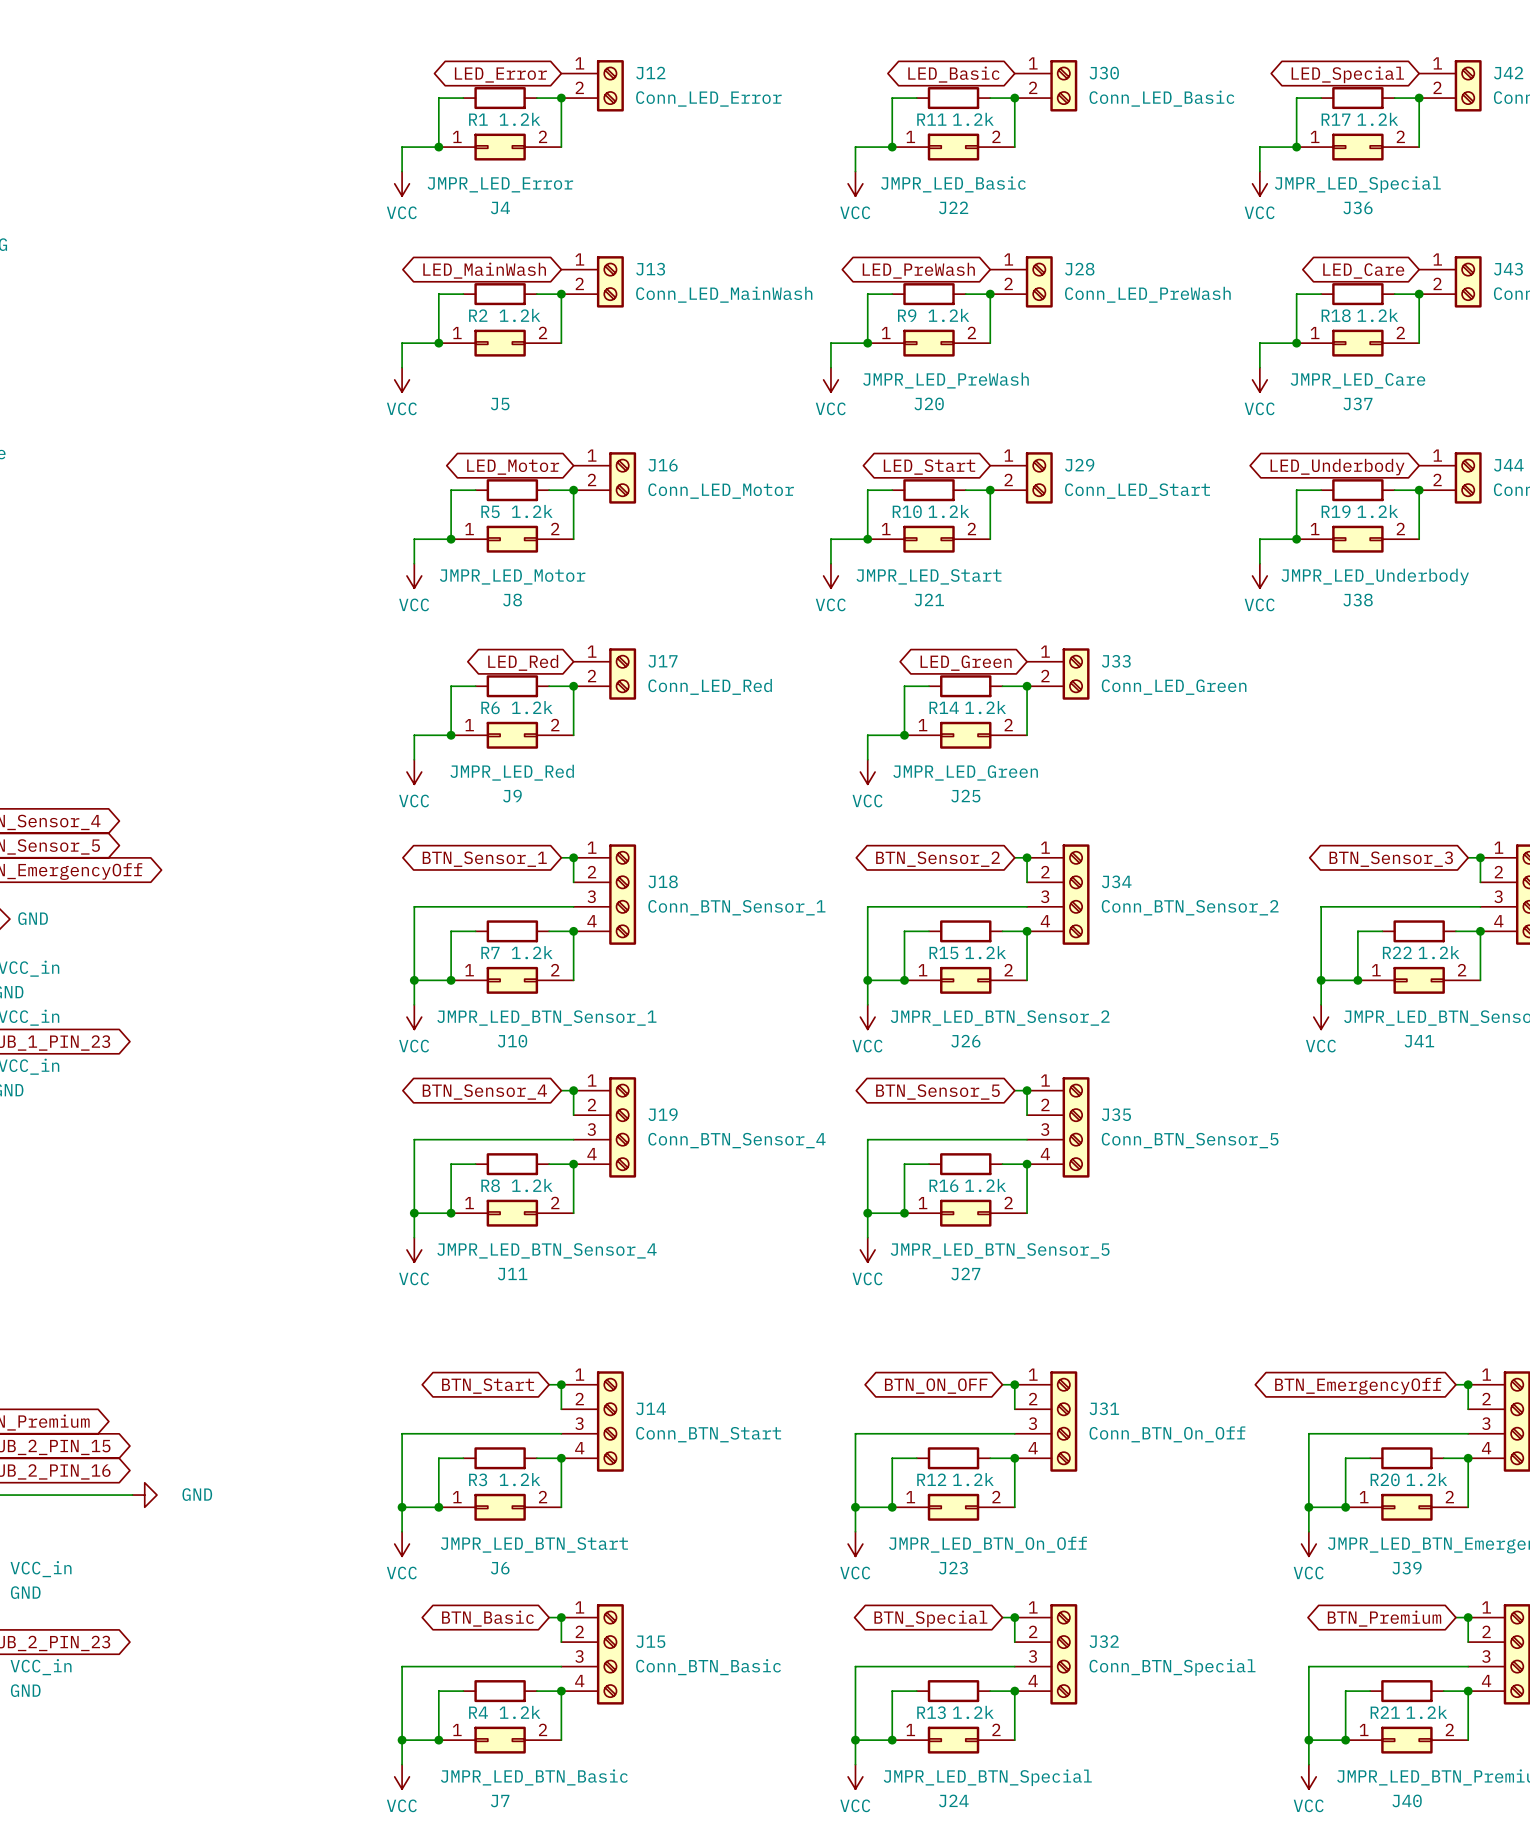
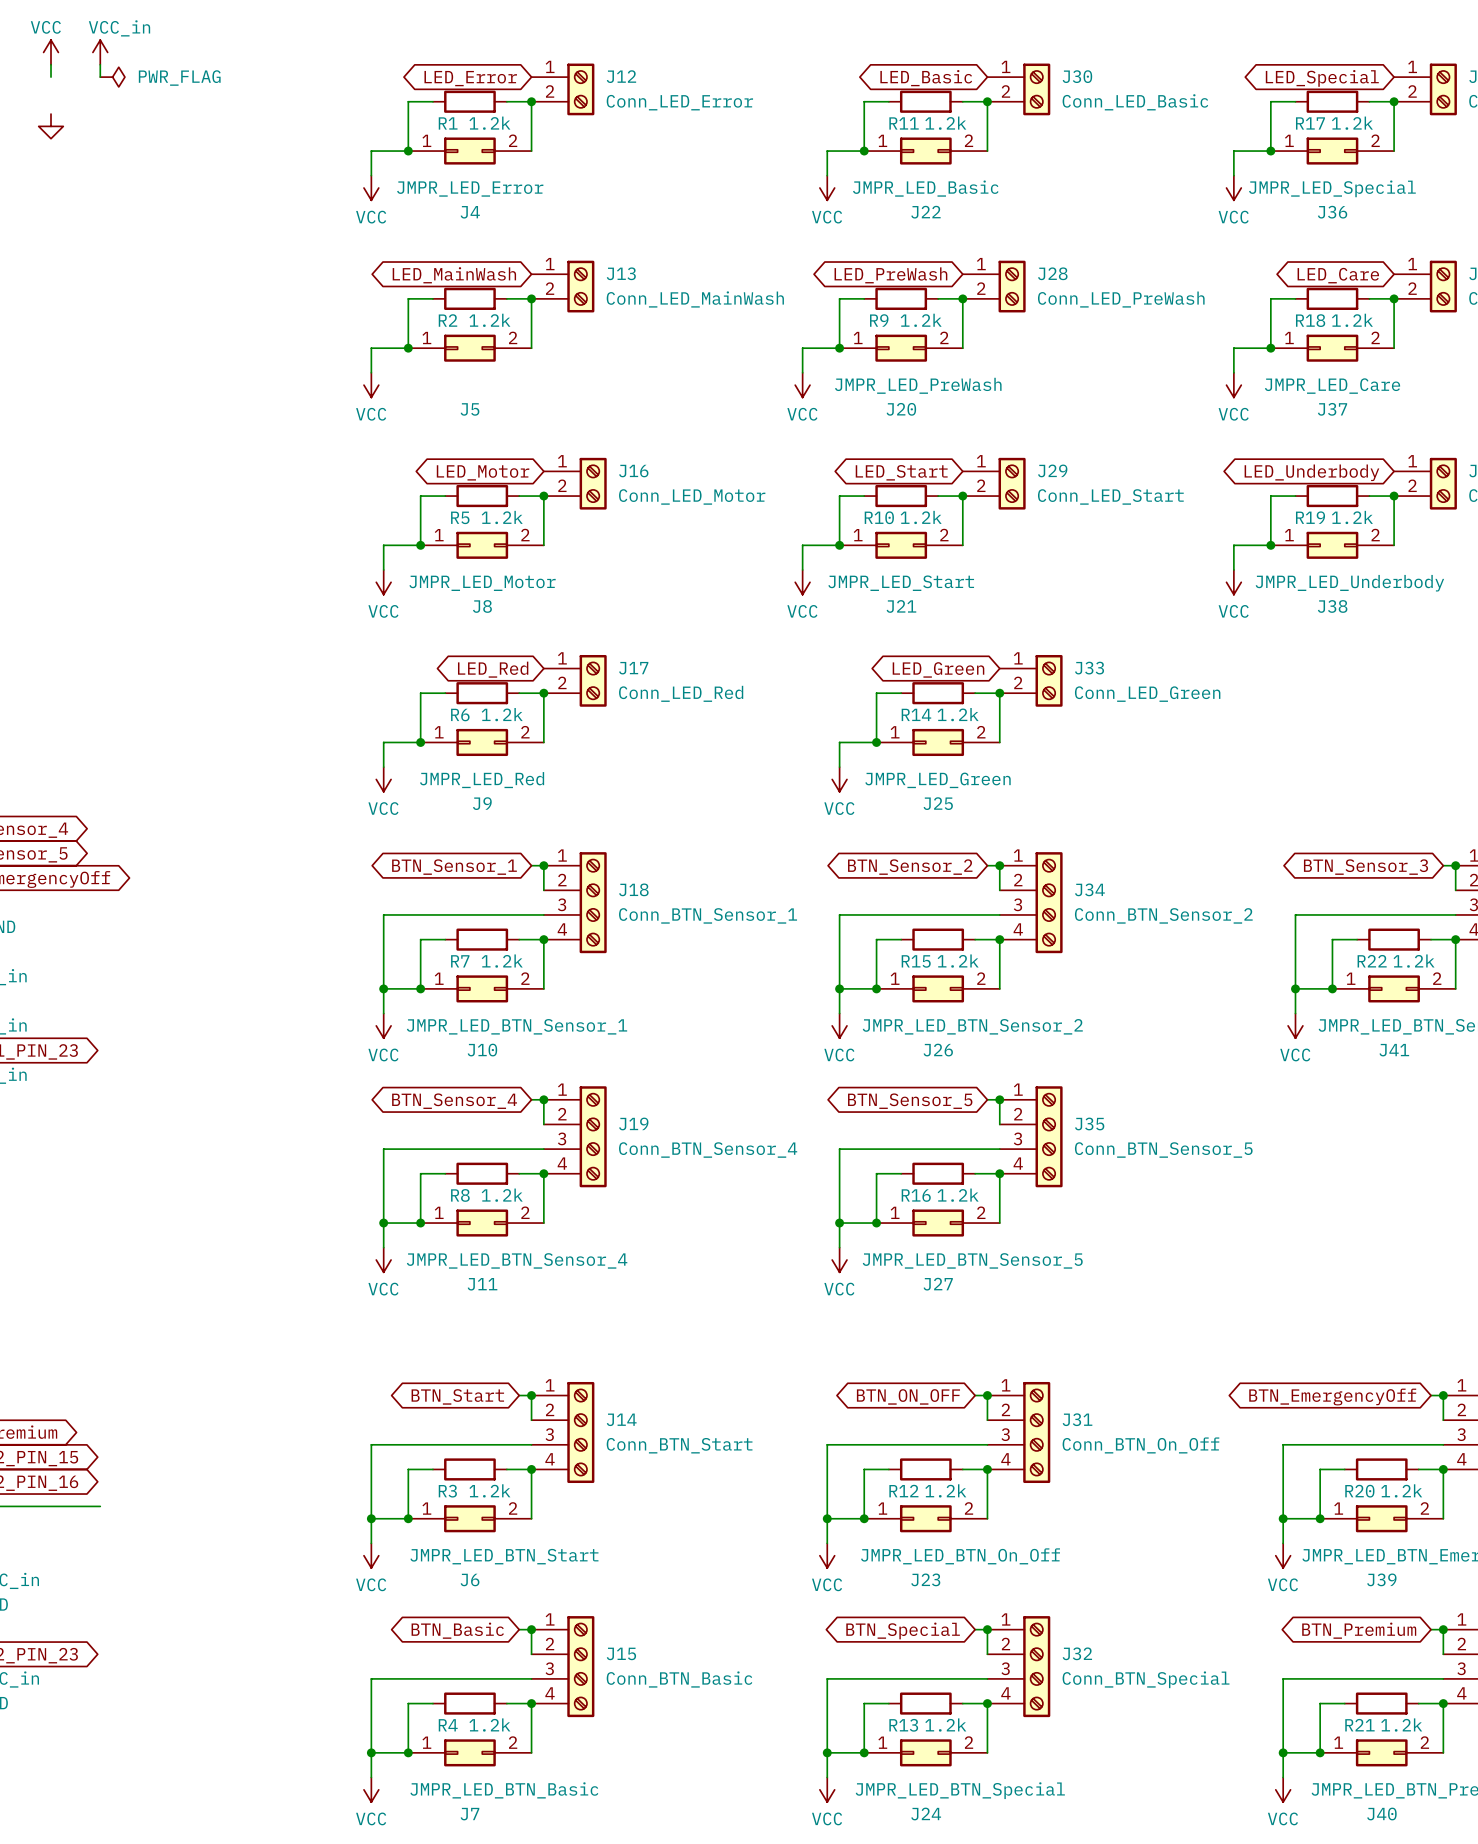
power symbol: none -> VCC (51, 52)
power symbol: none -> VCC_in (100, 52)
wire: none -> (51, 64) (51, 77)
wire: none -> (100, 64) (100, 77)
power symbol: none -> PWR_FLAG (112, 77)
power symbol: none -> (51, 126)
power symbol: GND (144, 1495) -> none

